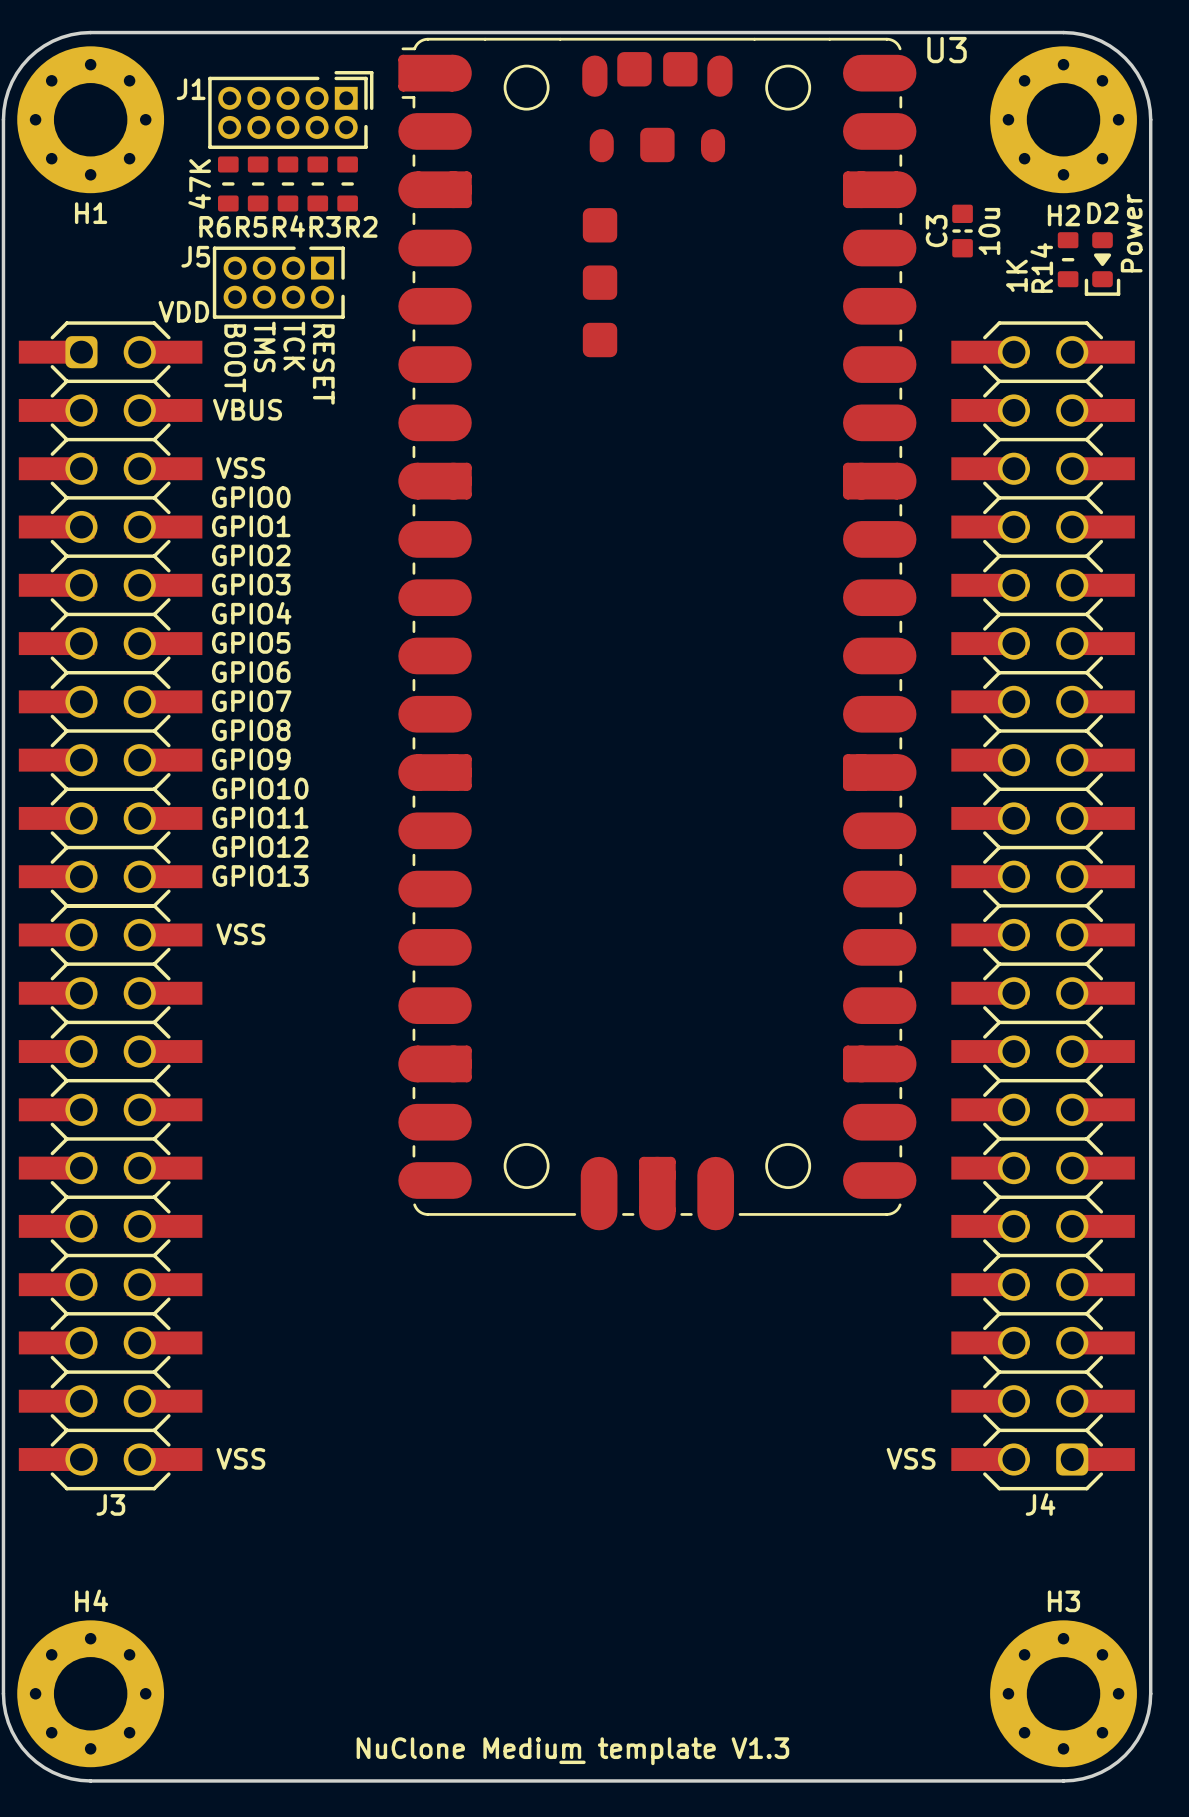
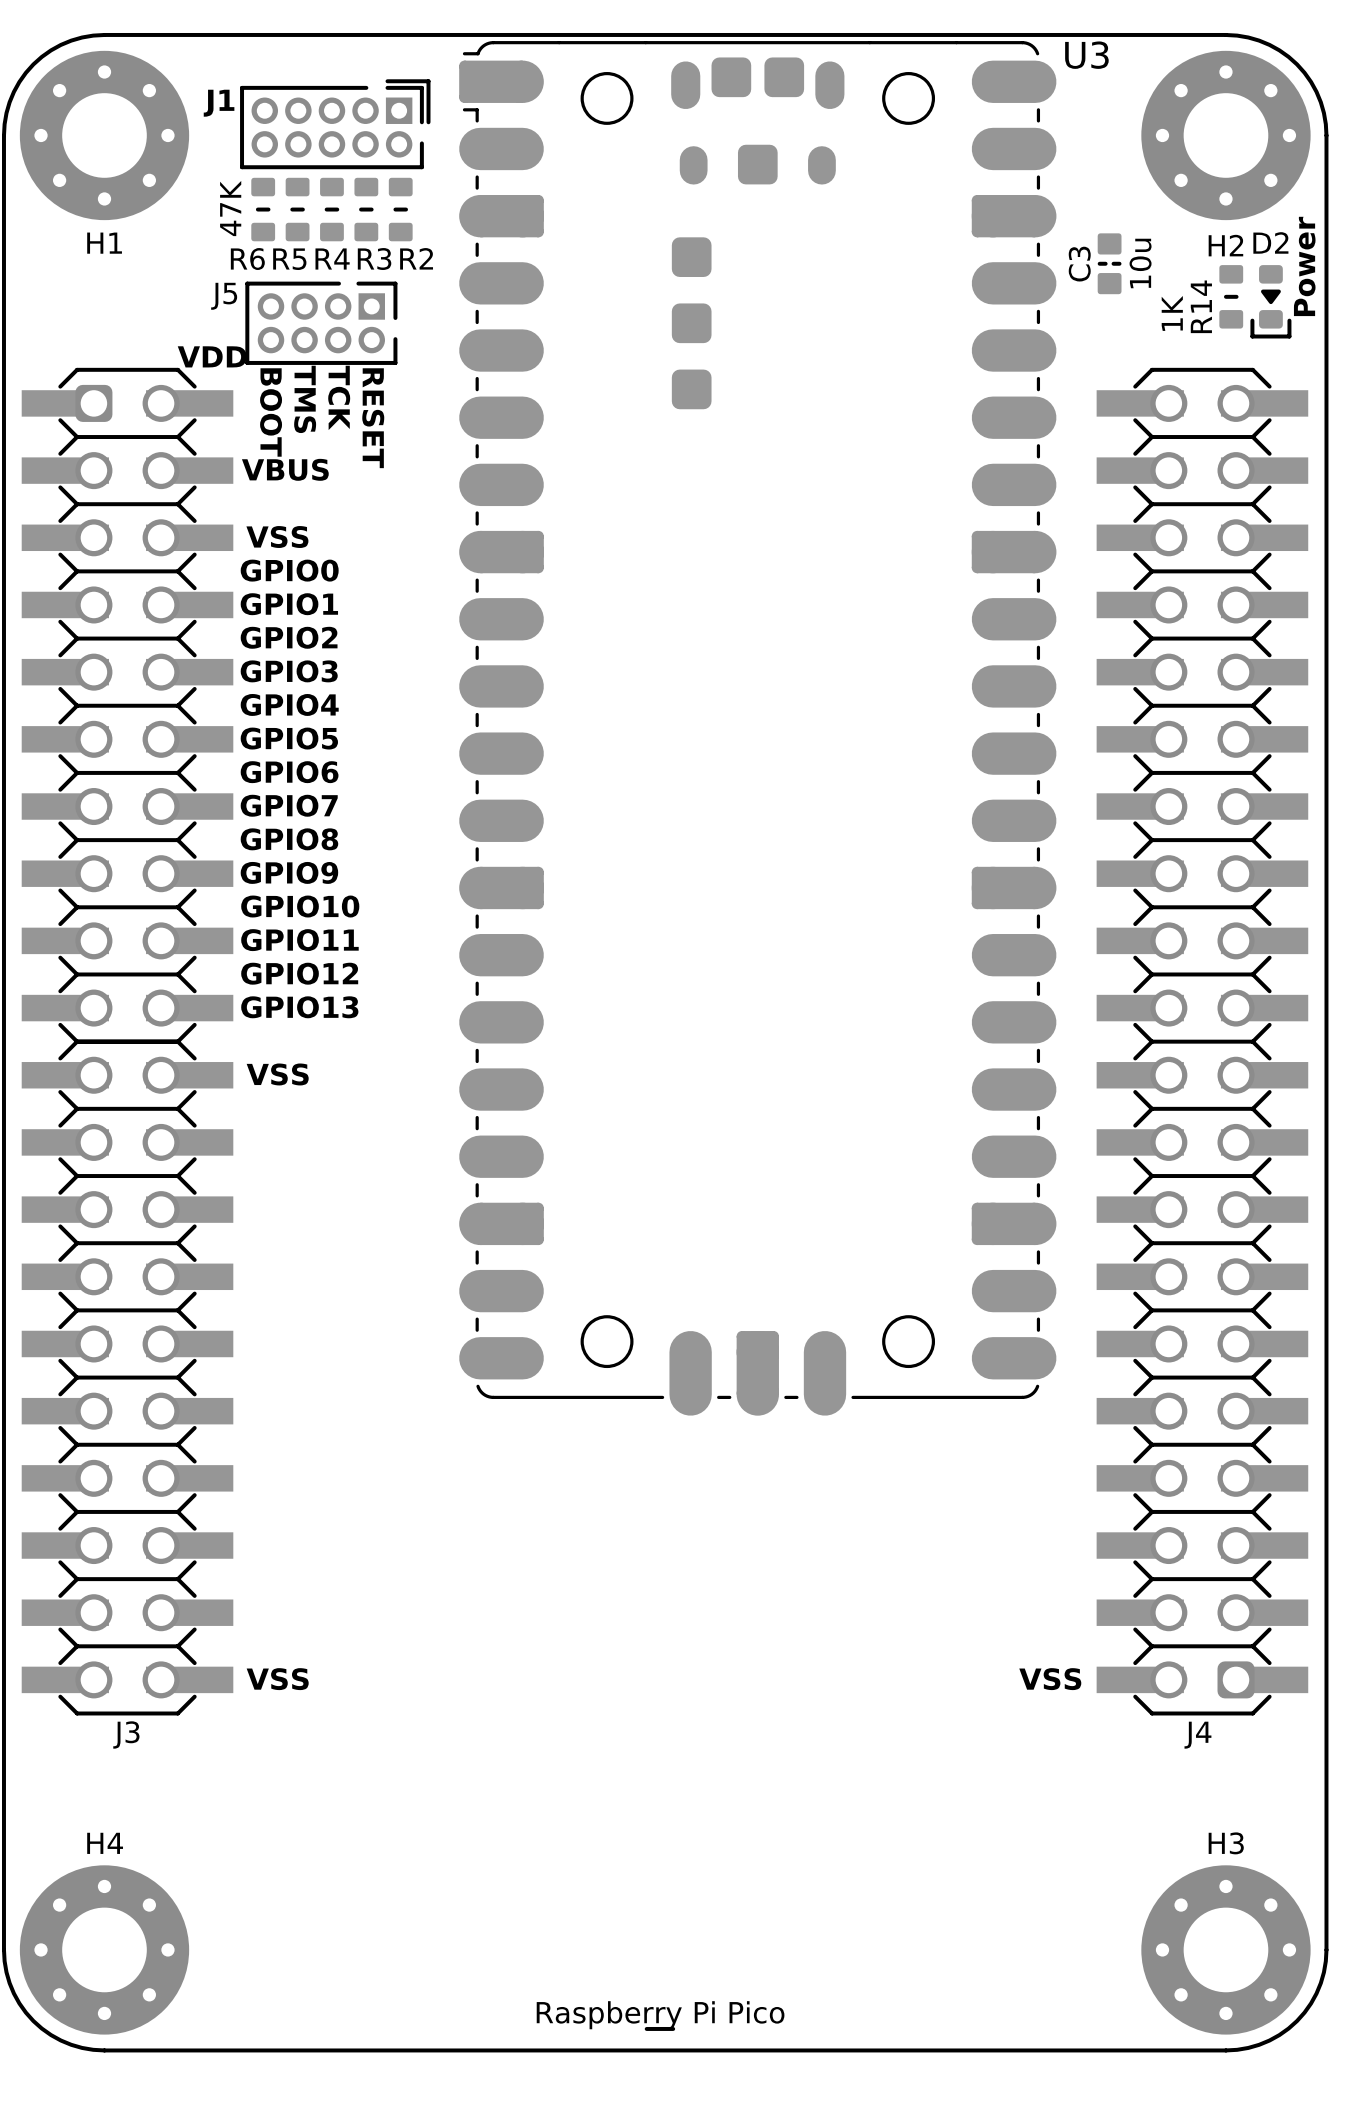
drawing shape: [356, 1737, 790, 1766] -> [536, 2001, 785, 2031]

